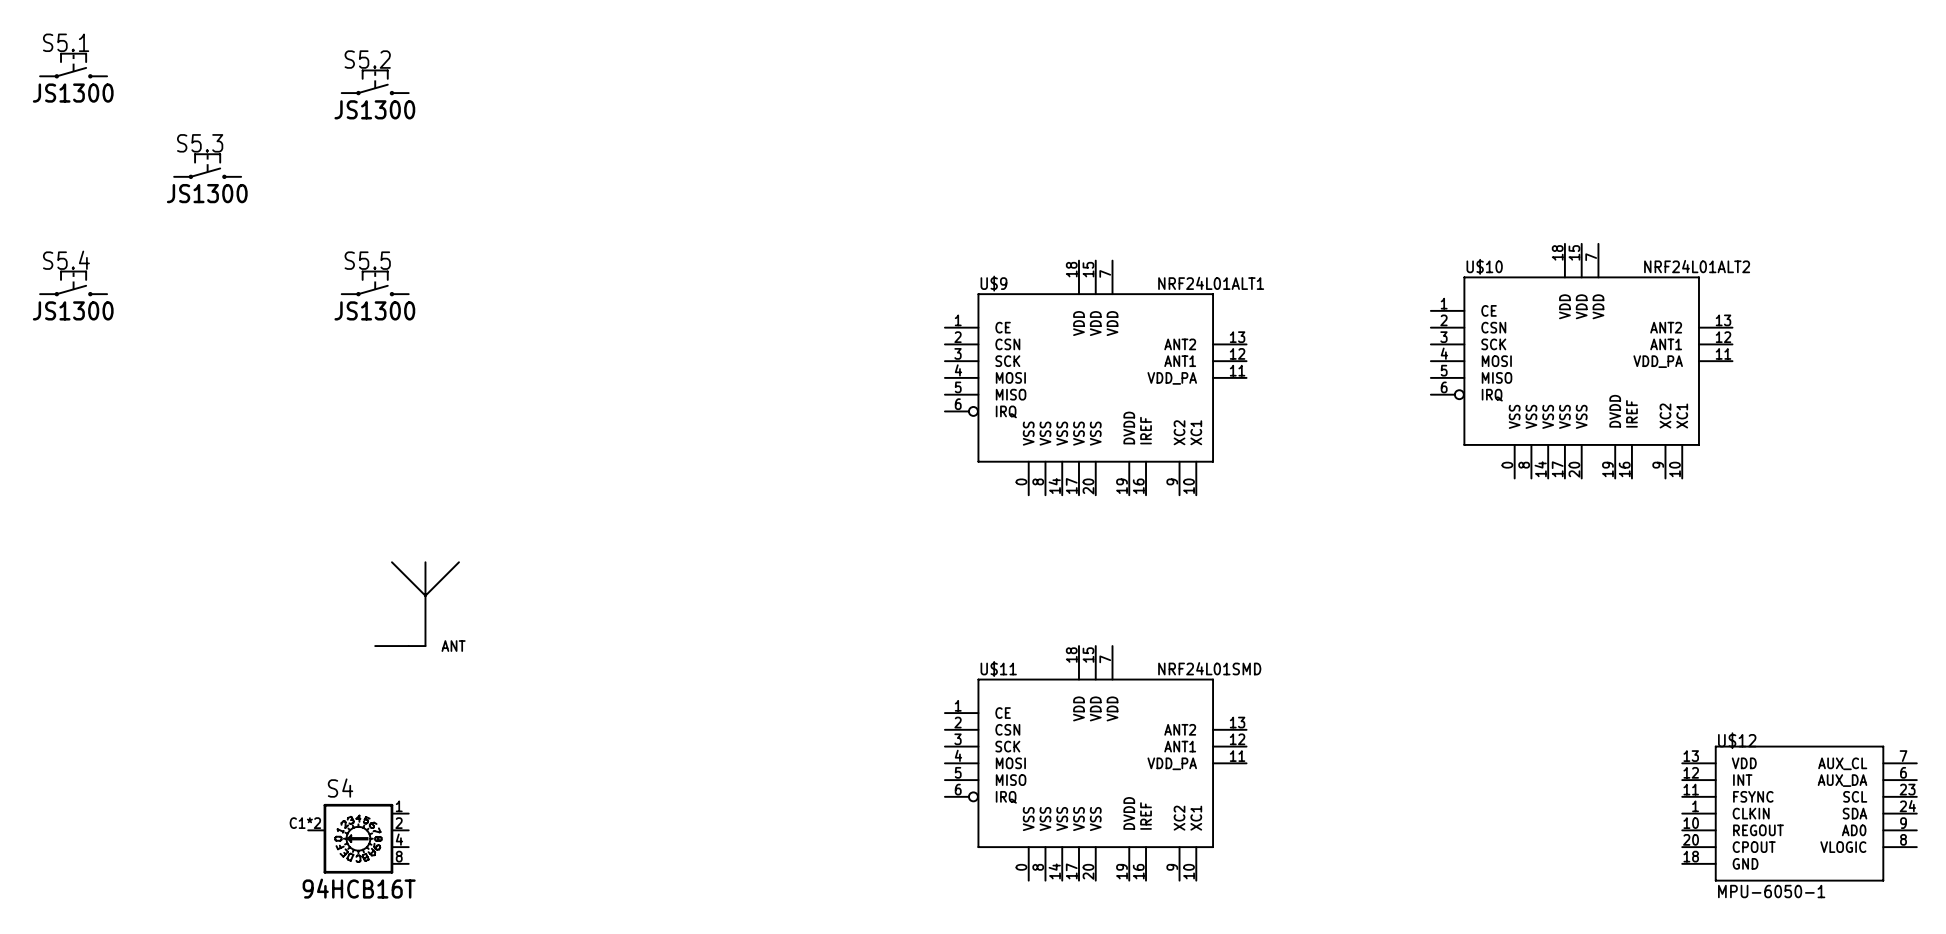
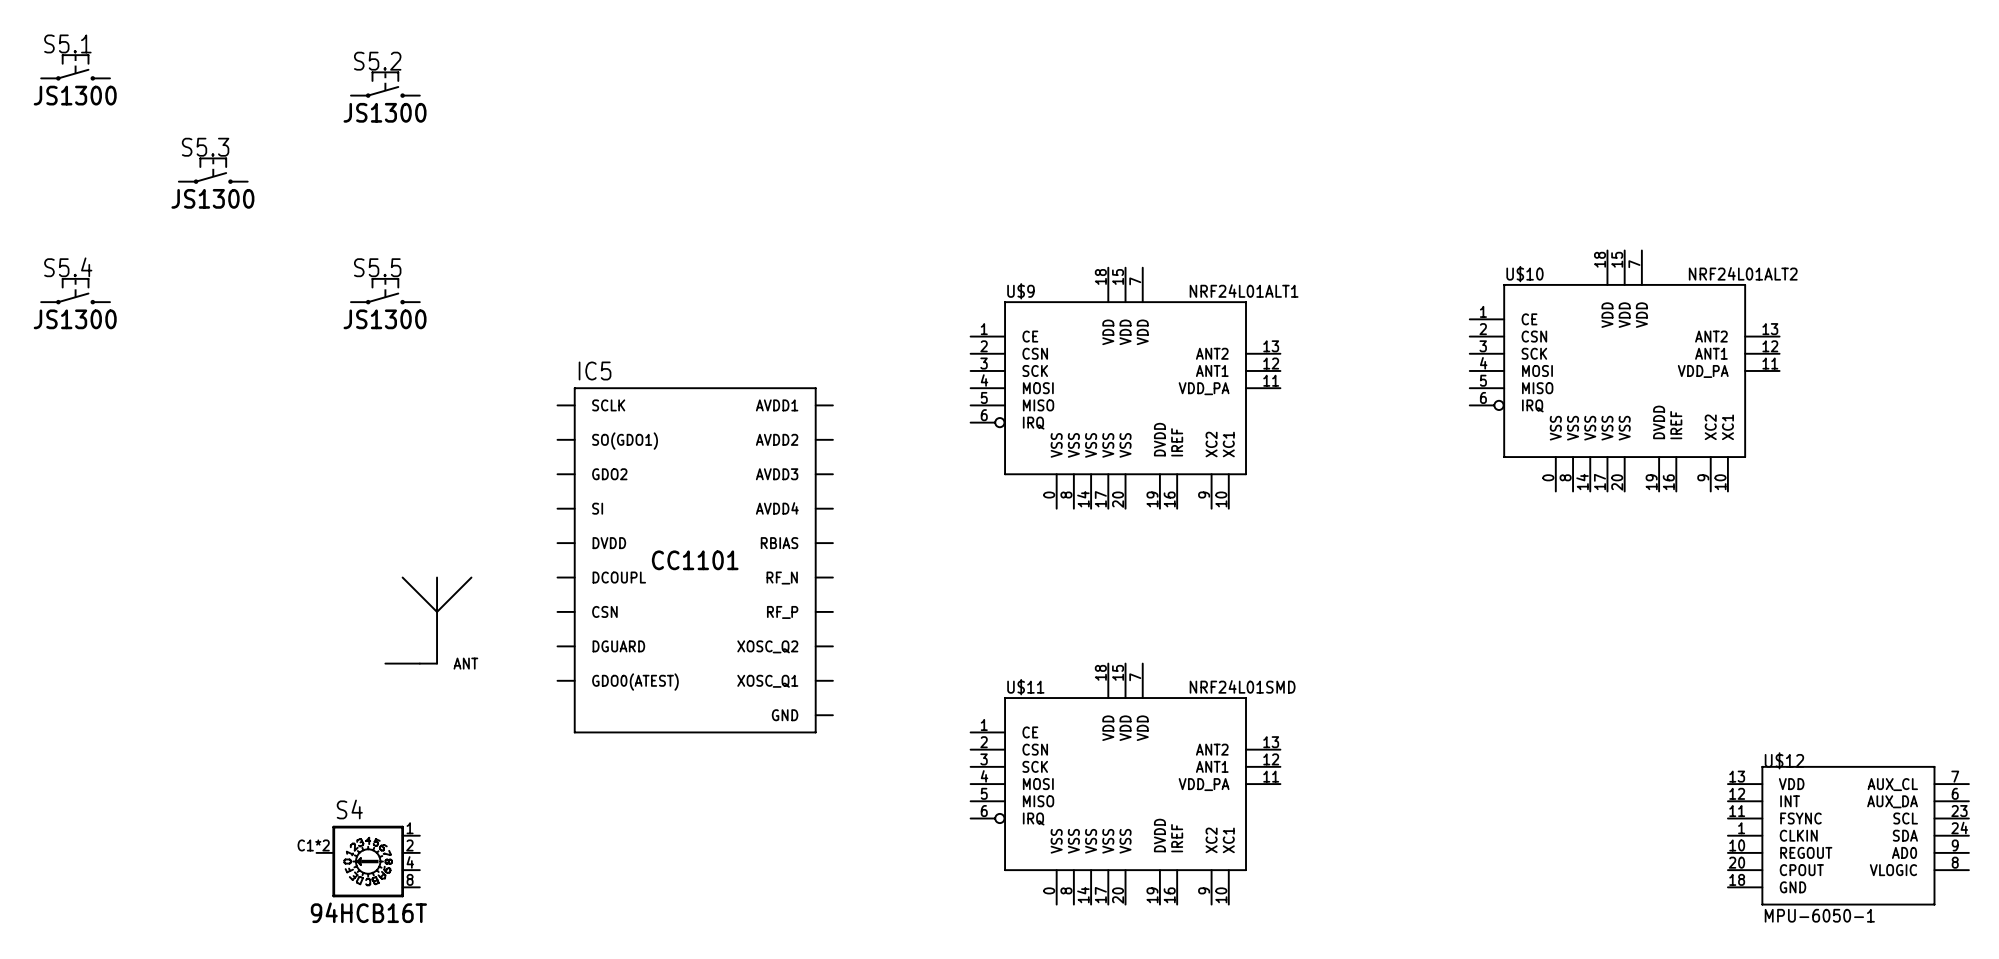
IC5: none -> CC1101 (695, 560)

